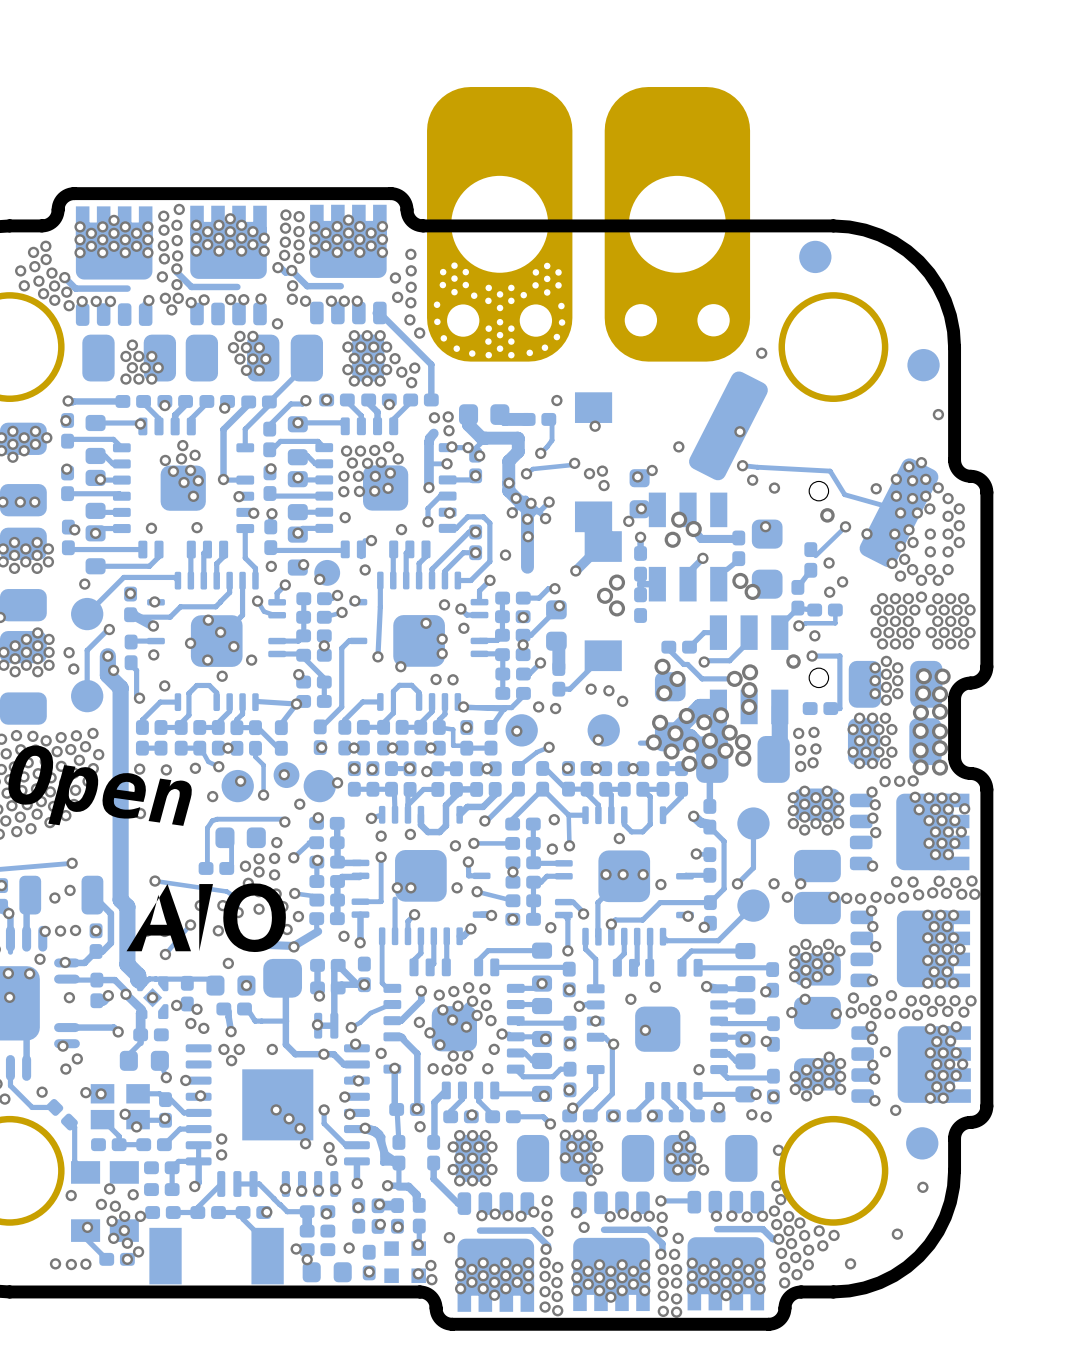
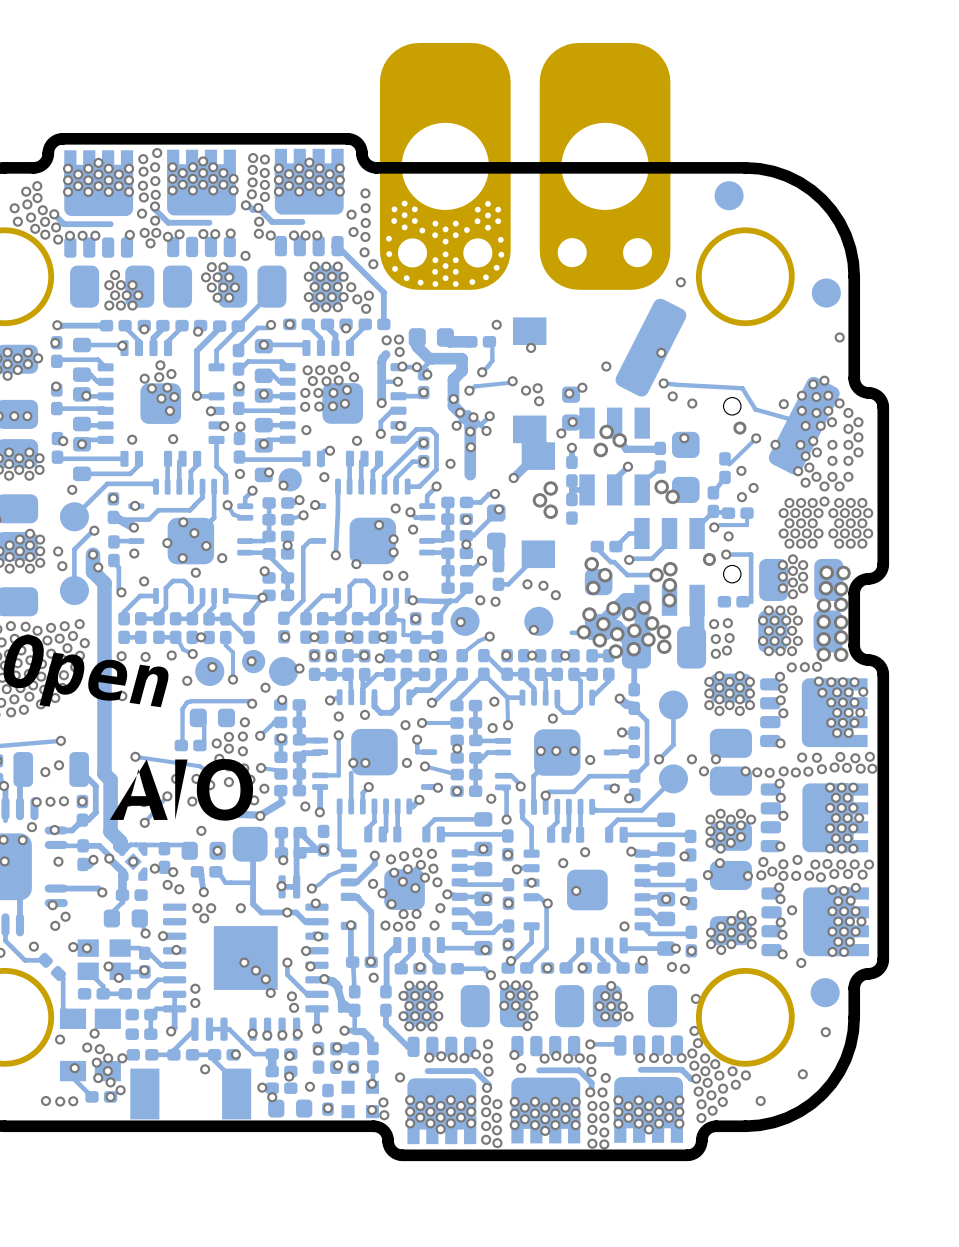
via: (381, 1053) -> none
via: (133, 1194) -> none
via: none -> (205, 1069)
via: none -> (289, 1076)

